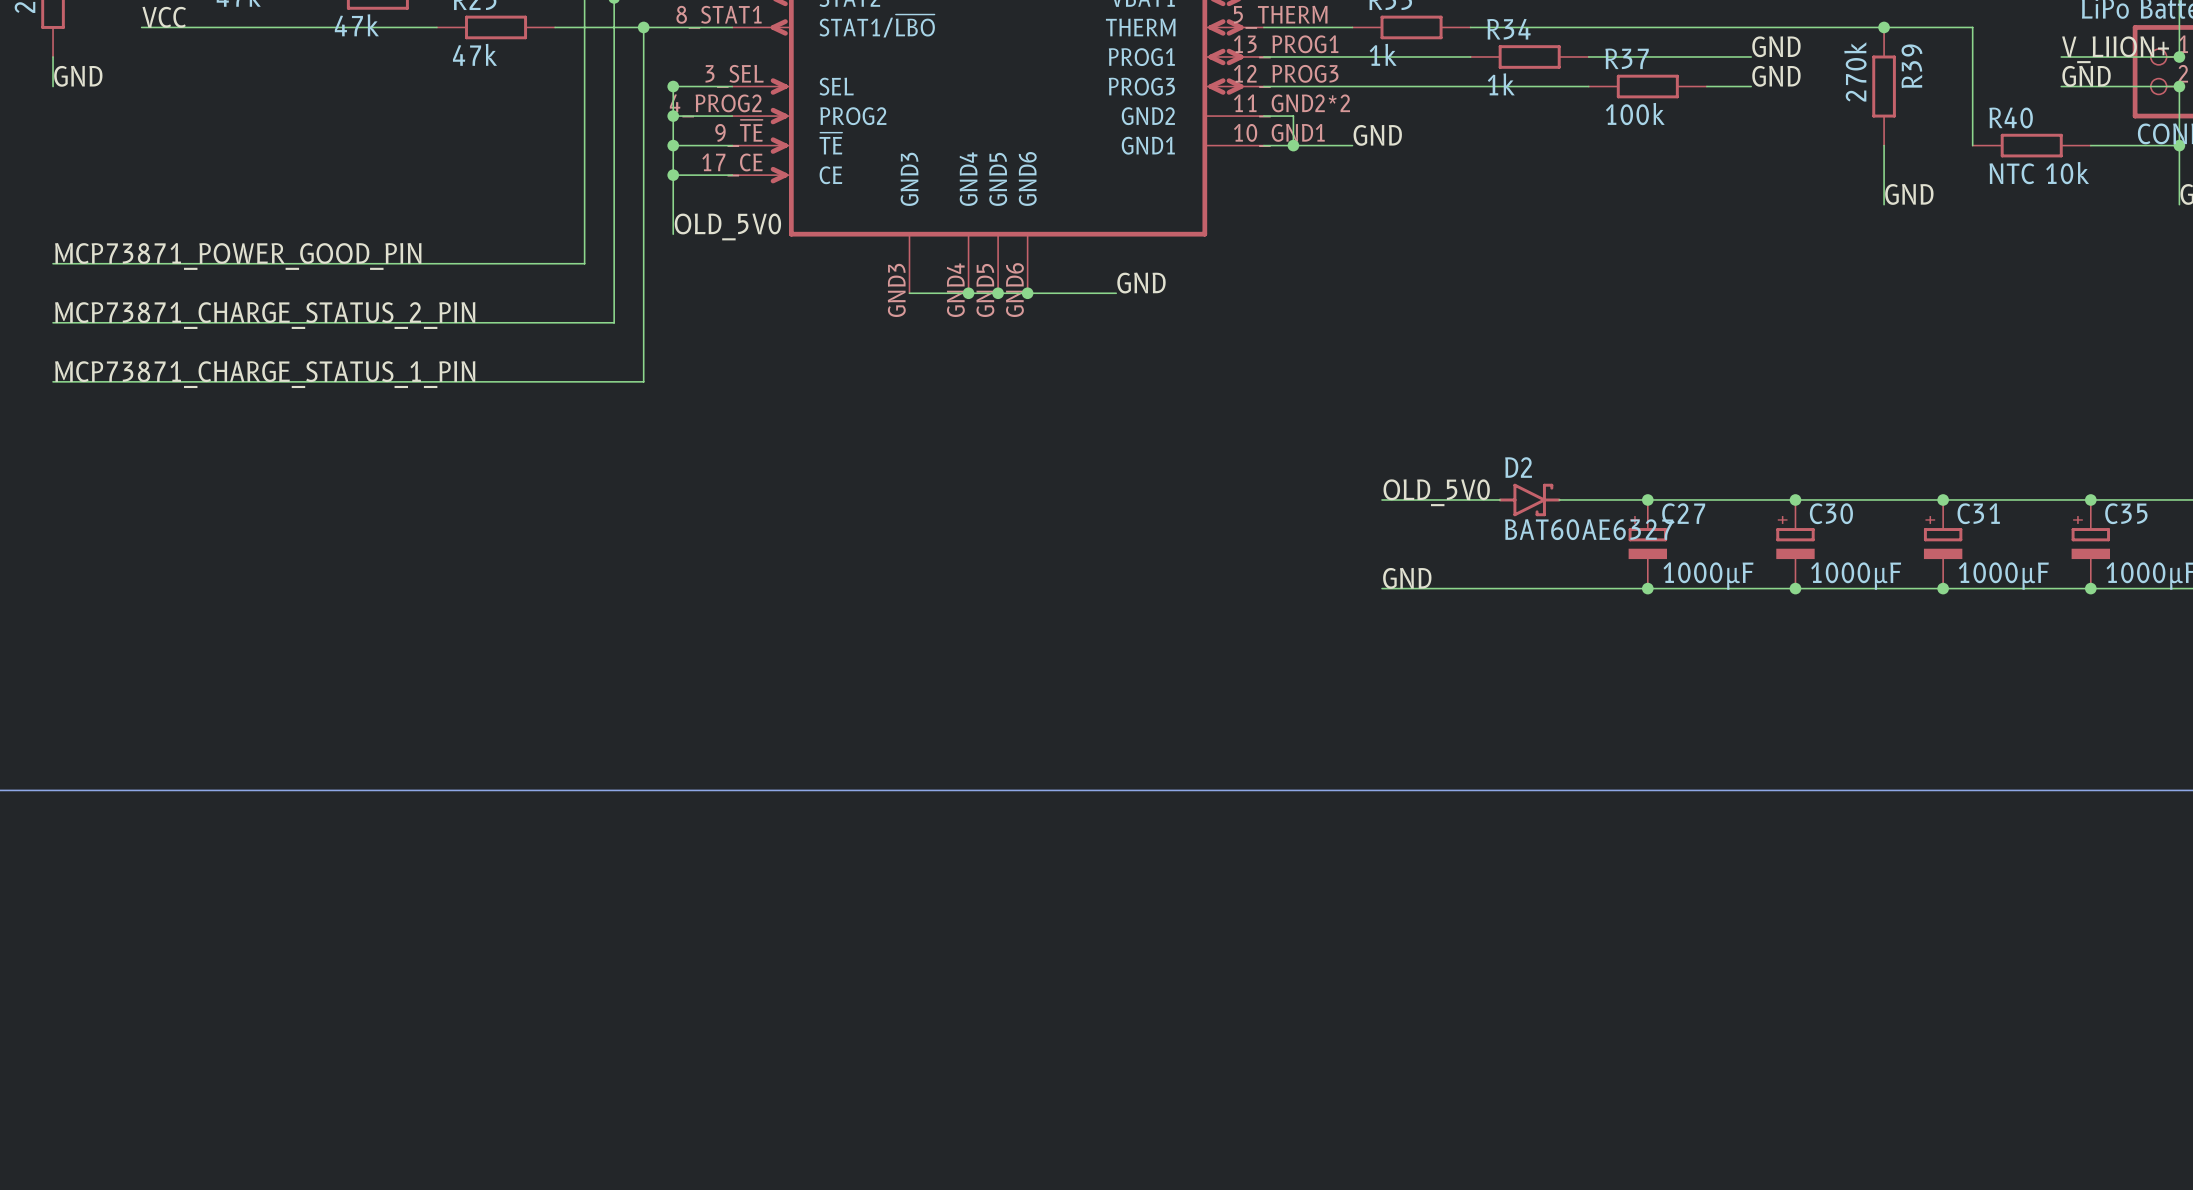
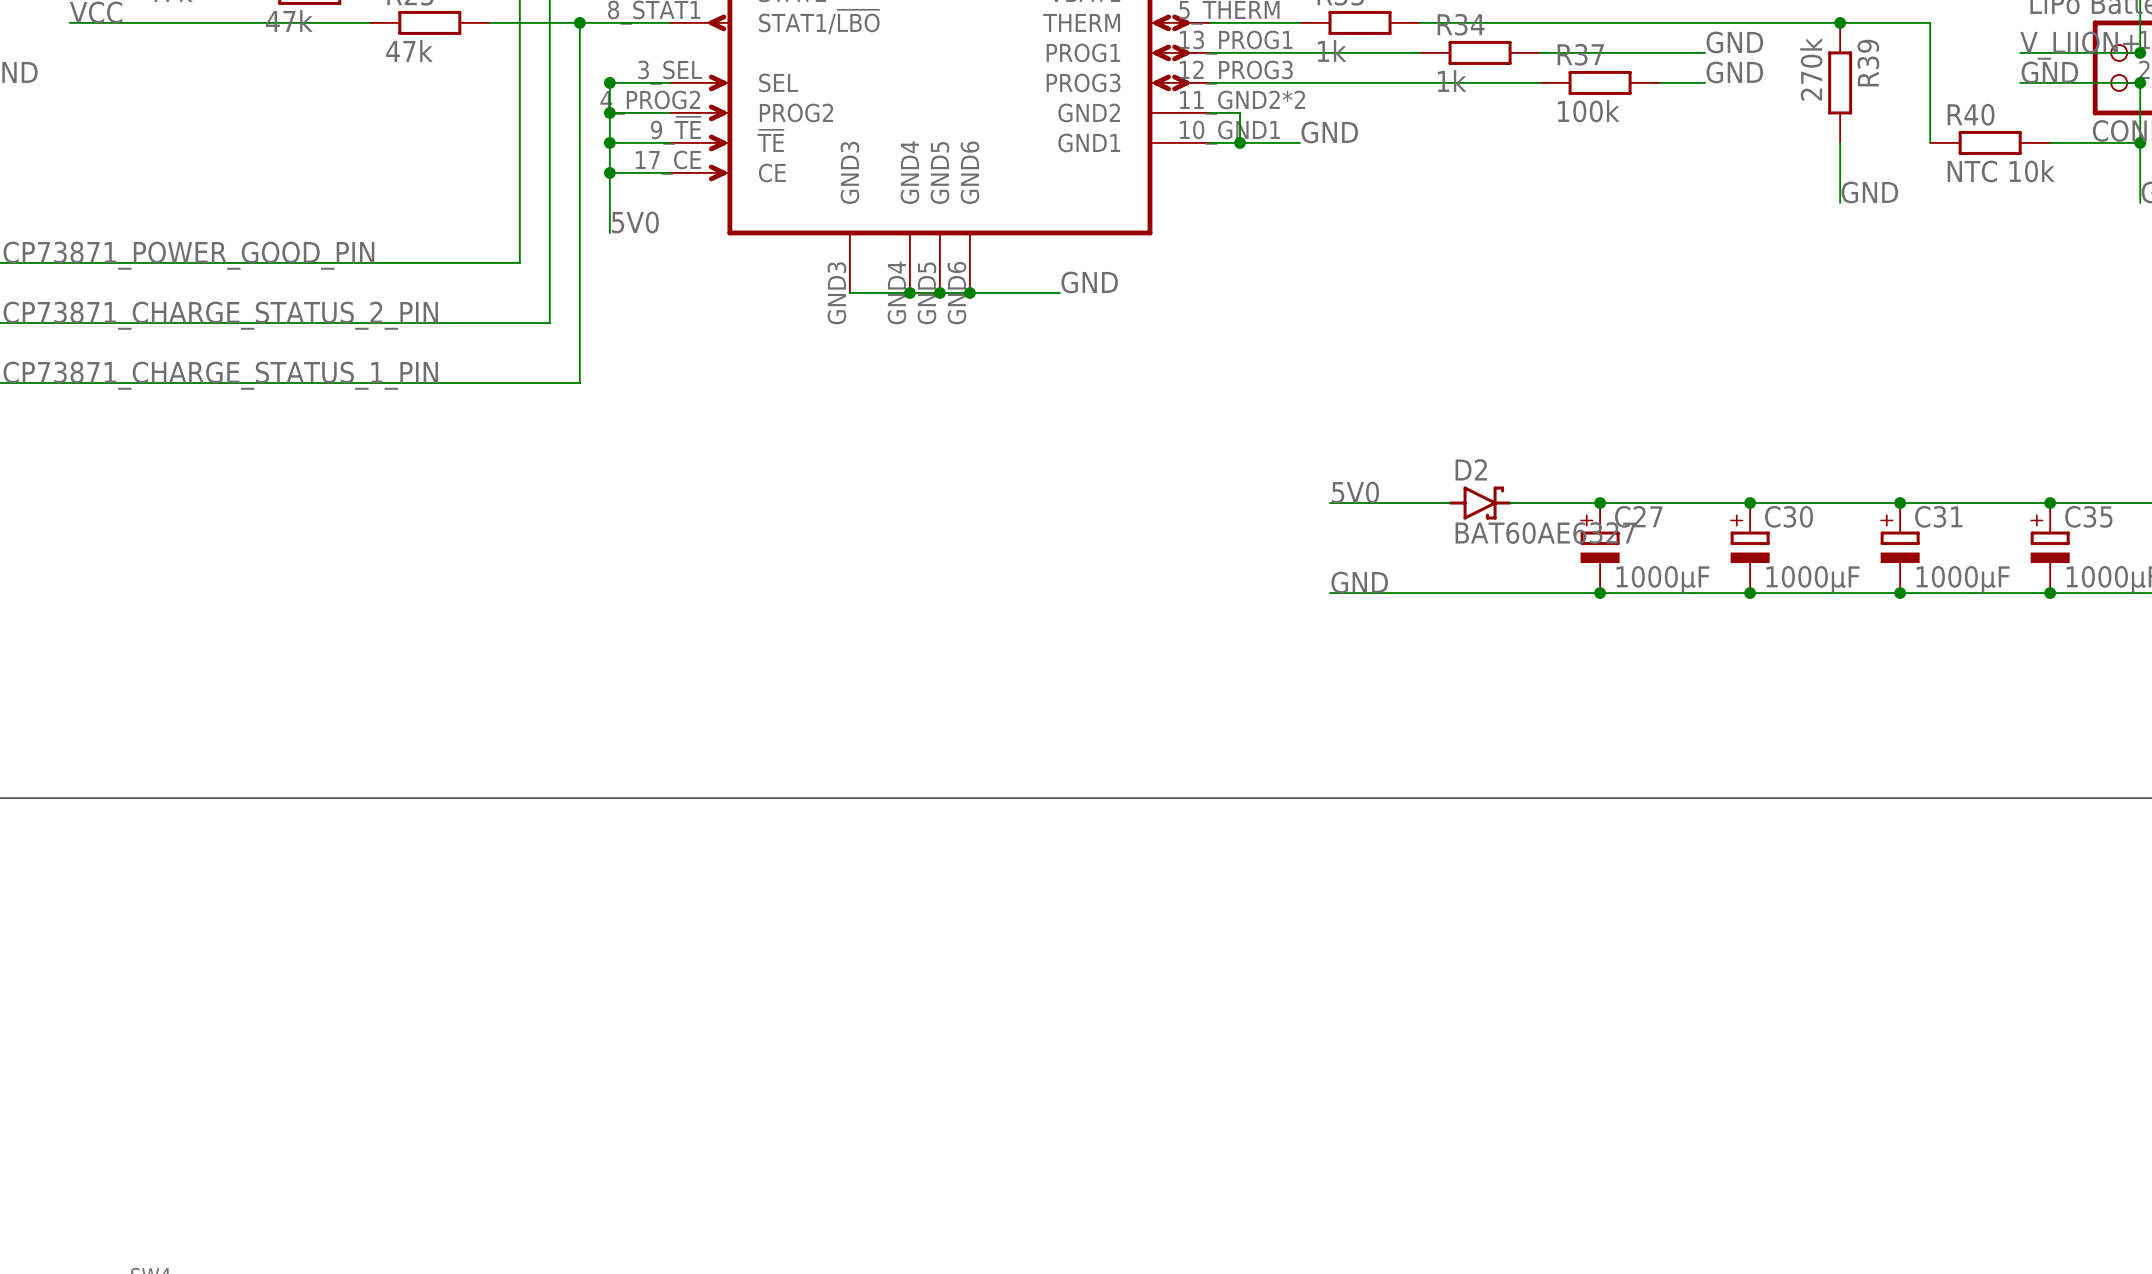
label: OLD_5V0 (727, 226) -> 5V0 (635, 222)
label: OLD_5V0 (1436, 492) -> 5V0 (1355, 492)

